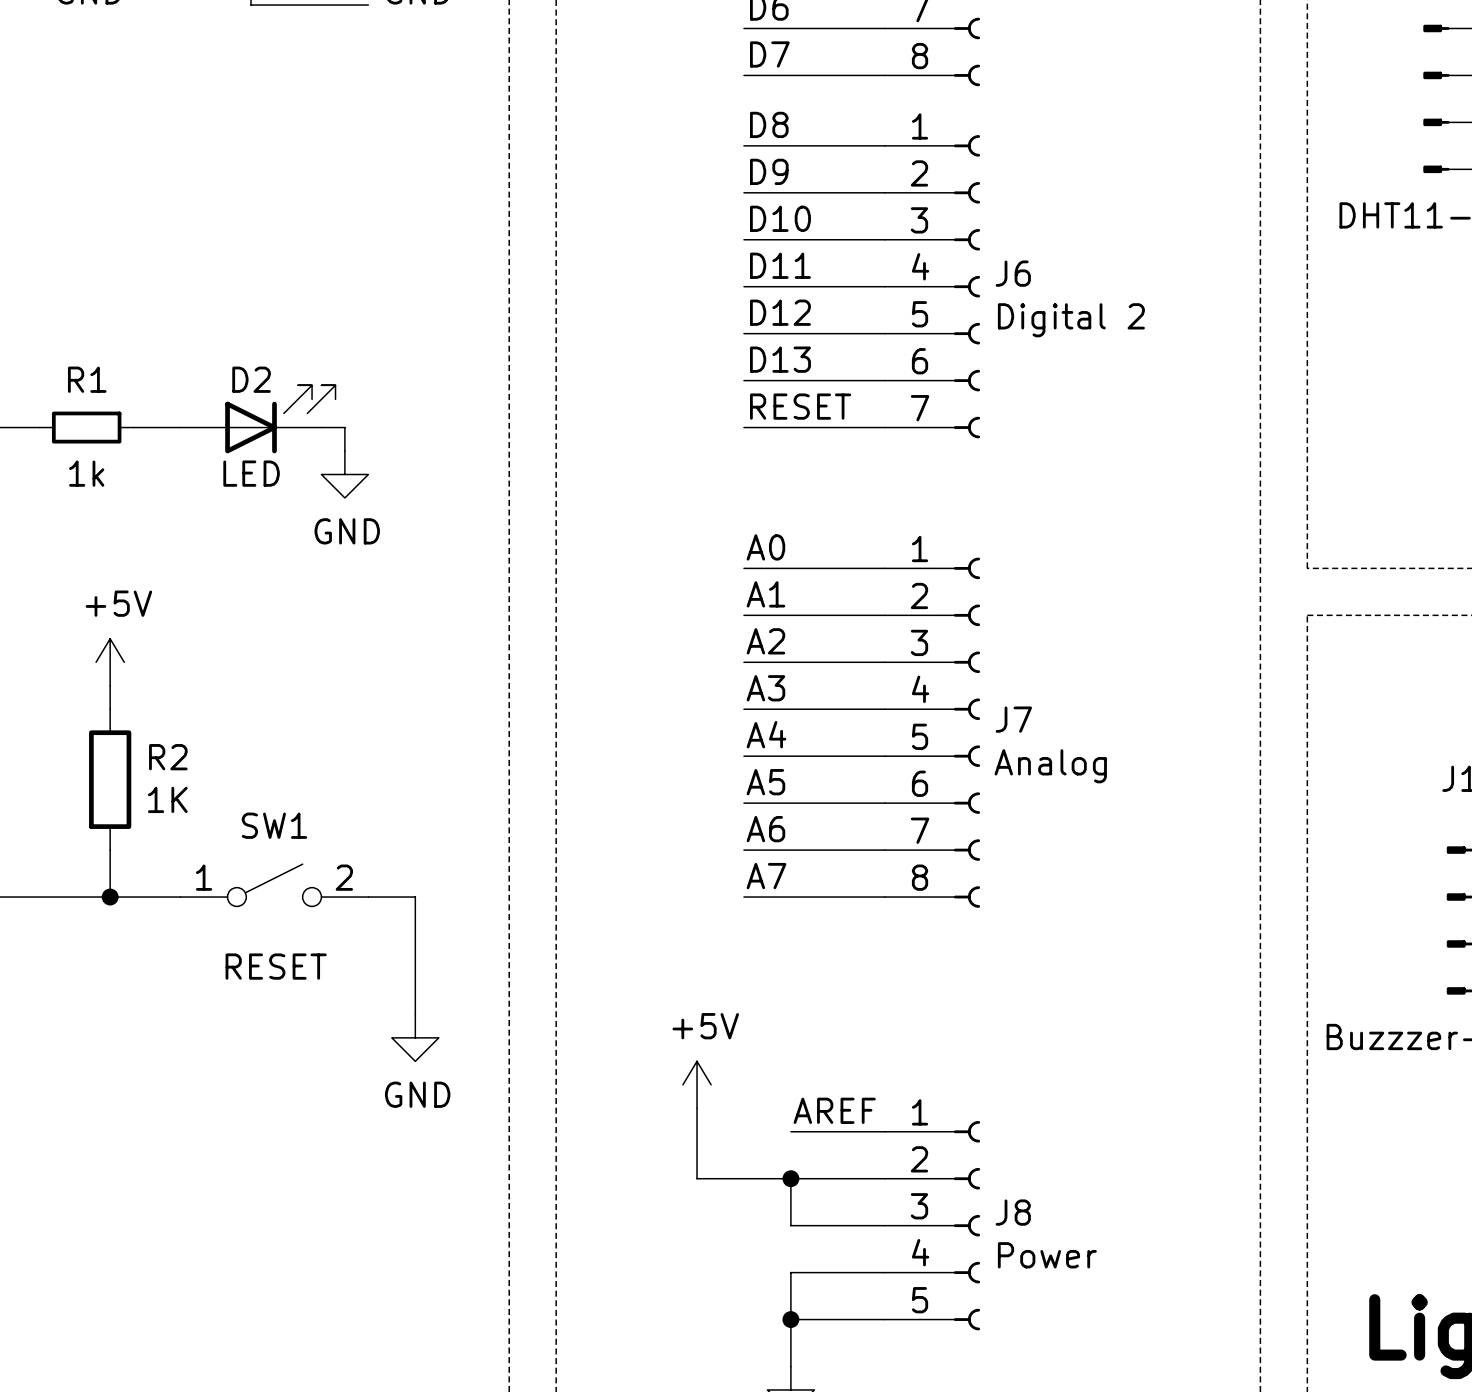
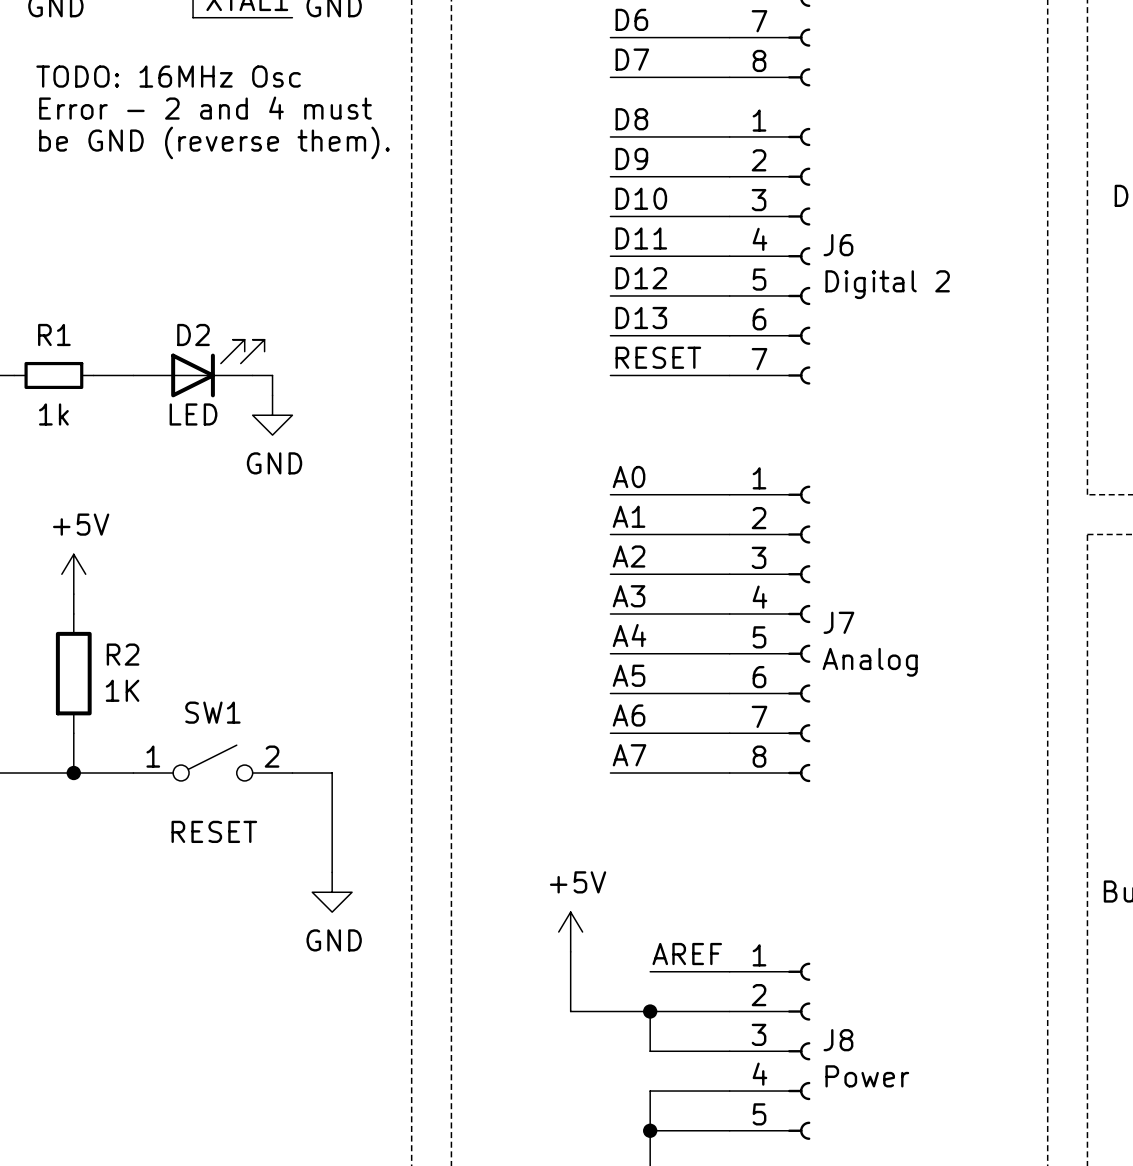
text: none -> TODO: 16MHz Osc (168, 76)
text: none -> Error - 2 and 4 must (205, 108)
text: none -> be GND (reverse them). (214, 142)

